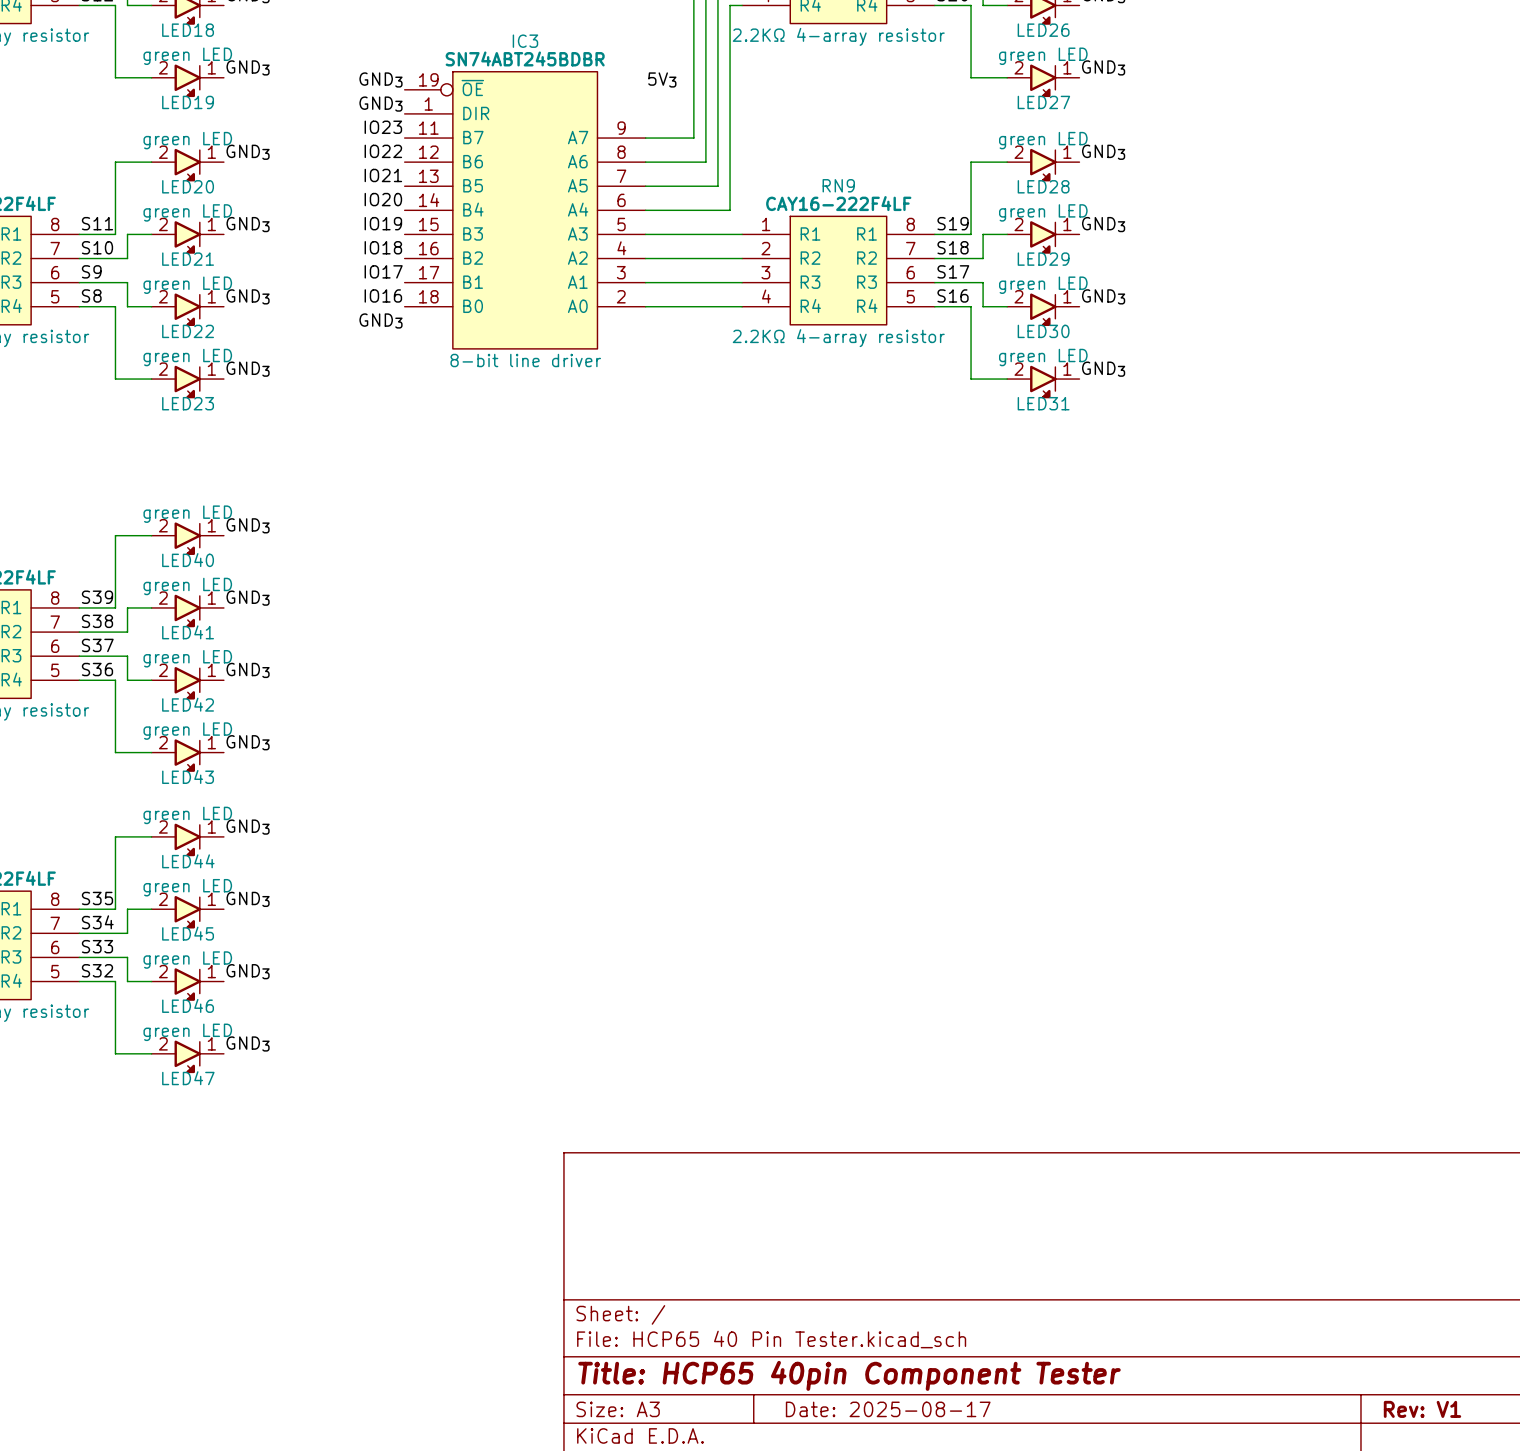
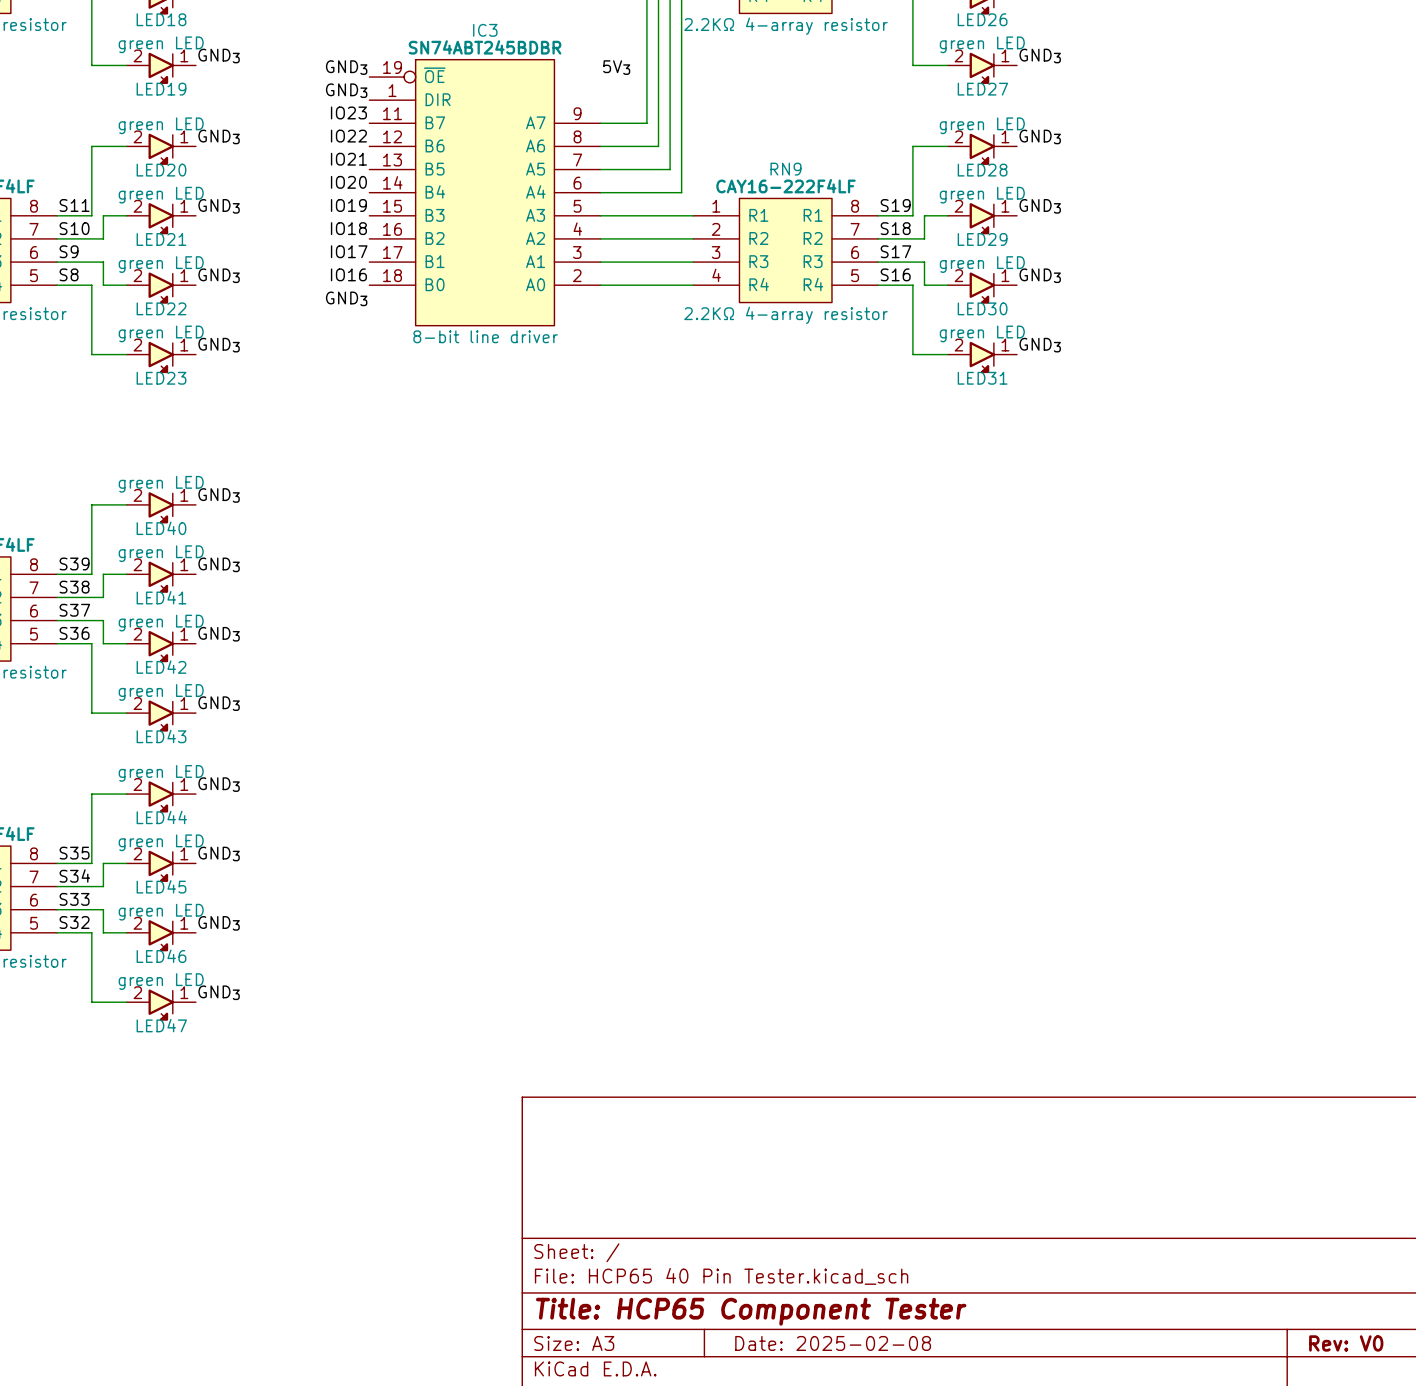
title block: Title: HCP65 40pin Component Tester (849, 1375) -> Title: HCP65 Component Tester (751, 1311)
title block: Date: 2025-08-17 (888, 1409) -> Date: 2025-02-08 (833, 1343)
title block: Rev: V1 (1422, 1409) -> Rev: V0 (1346, 1343)

